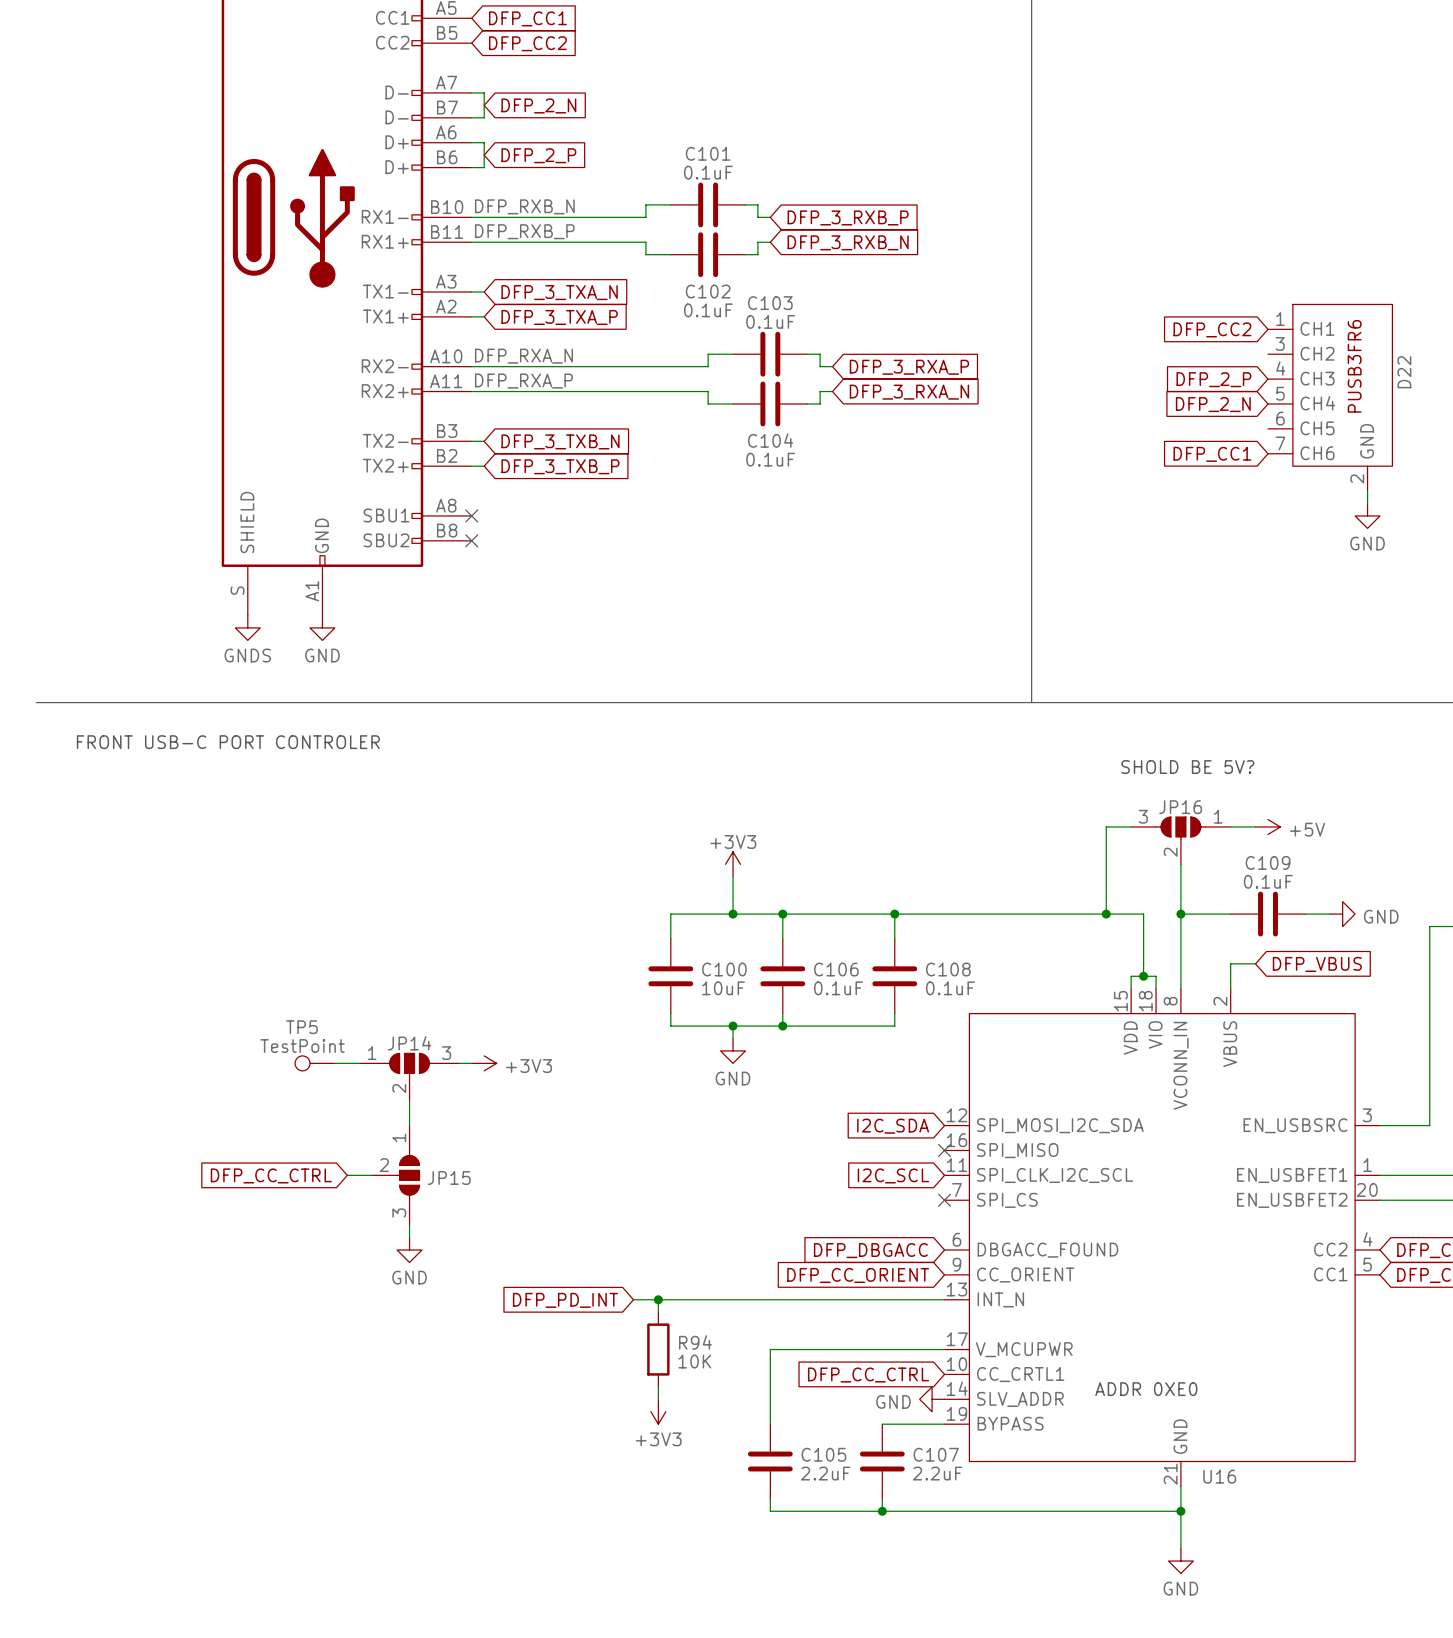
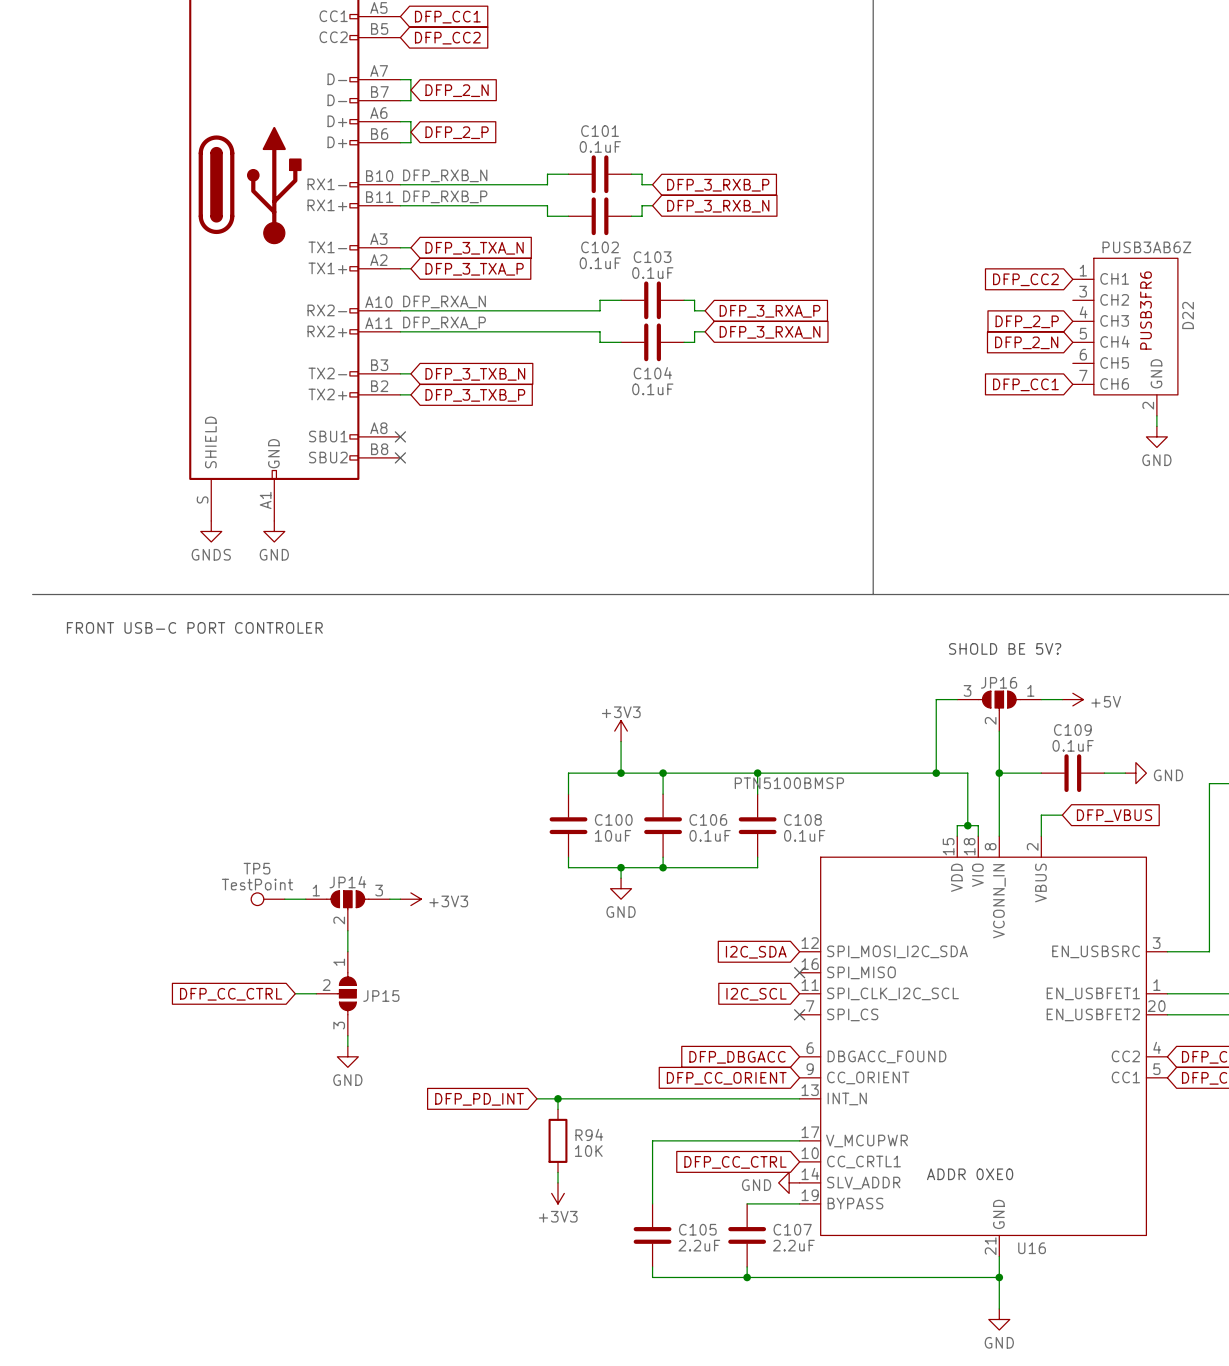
D22 value: none -> PUSB3AB6Z (1146, 247)
U16 value: none -> PTN5100BMSP (789, 783)

